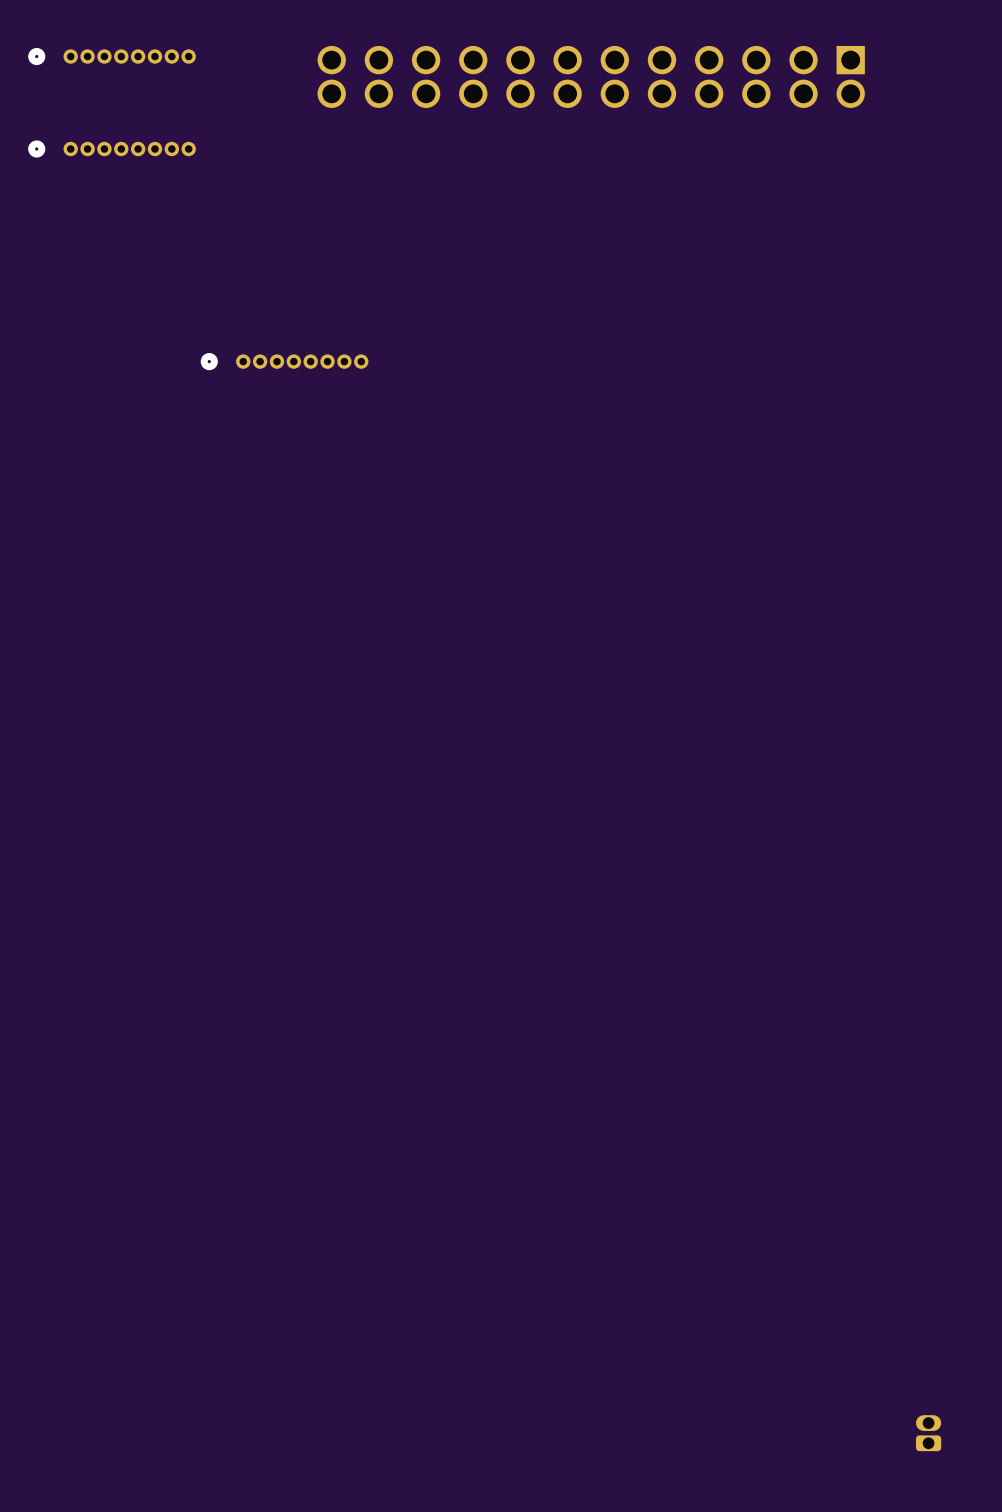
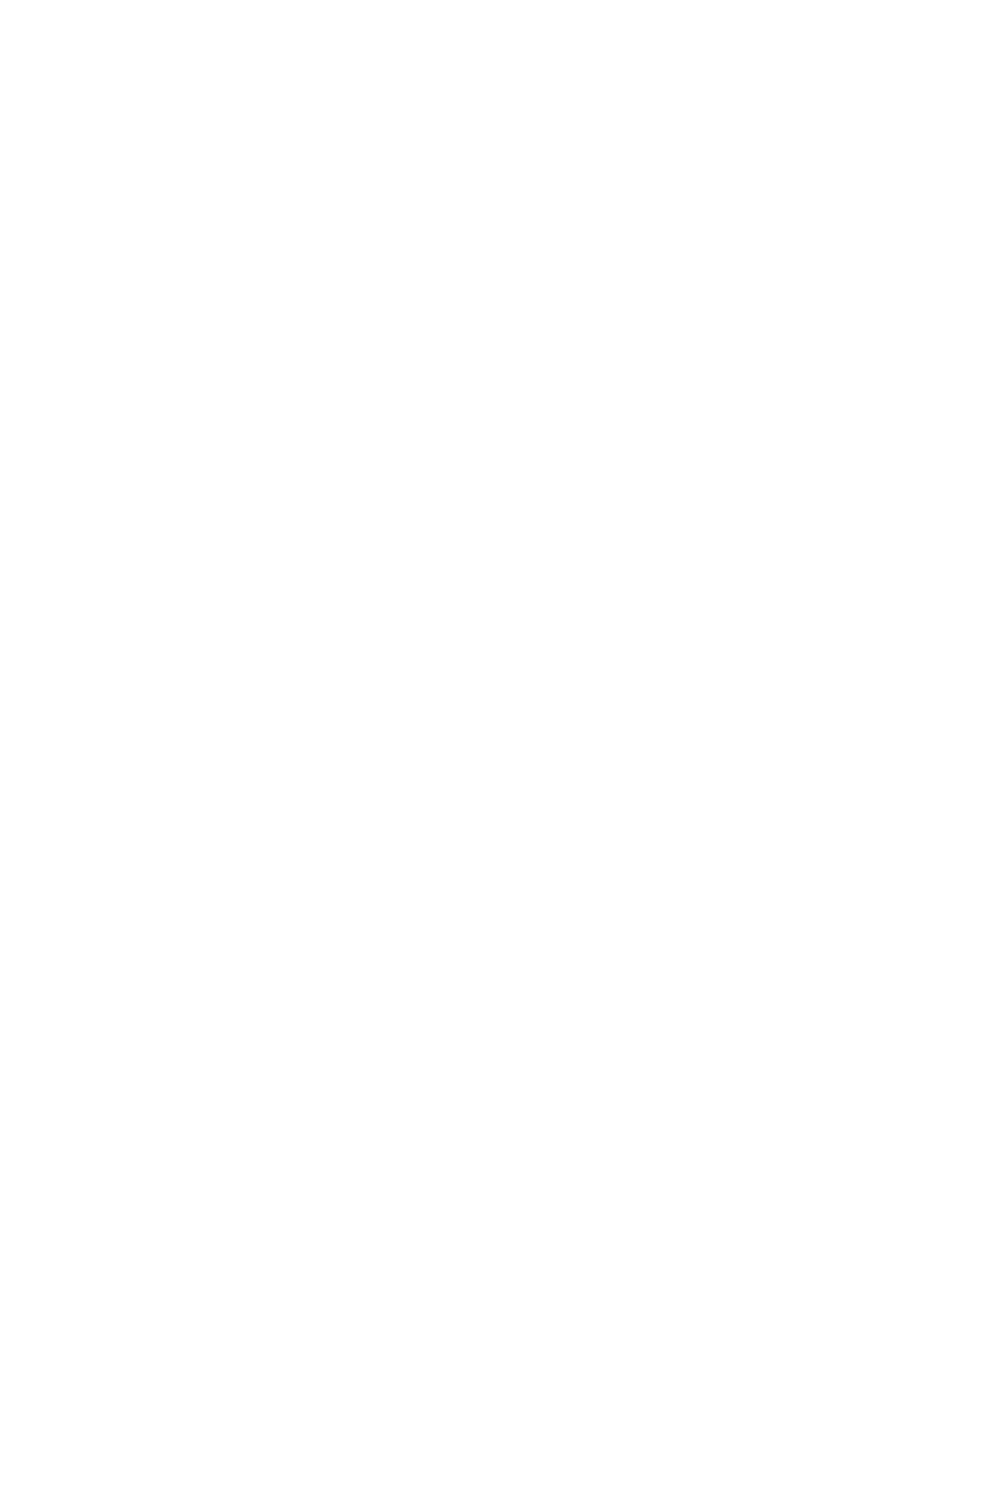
part: (112, 56) -> none
part: (591, 76) -> none
part: (112, 149) -> none
part: (284, 361) -> none
part: (928, 1433) -> none

